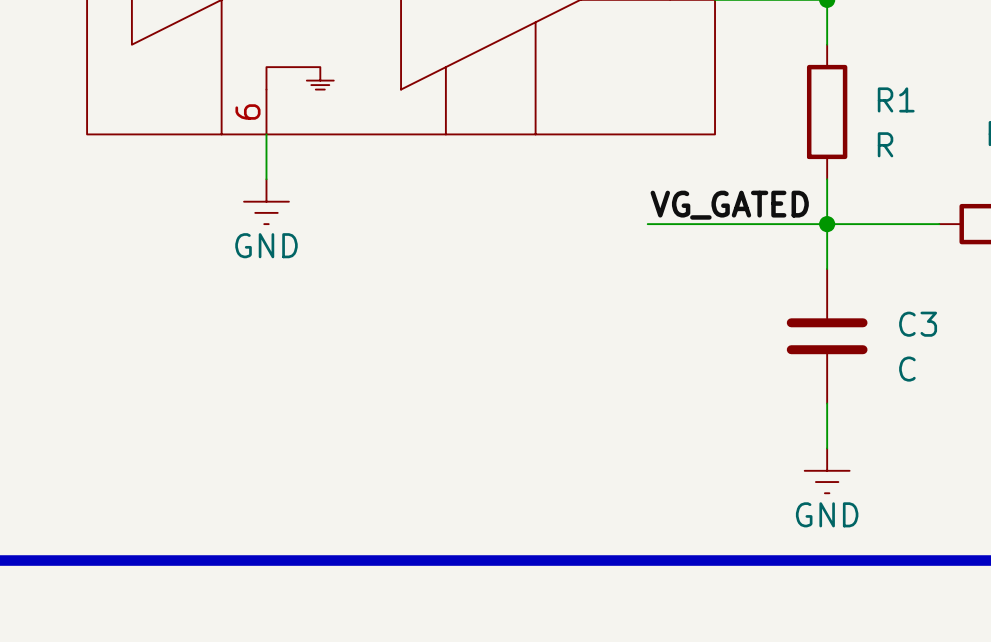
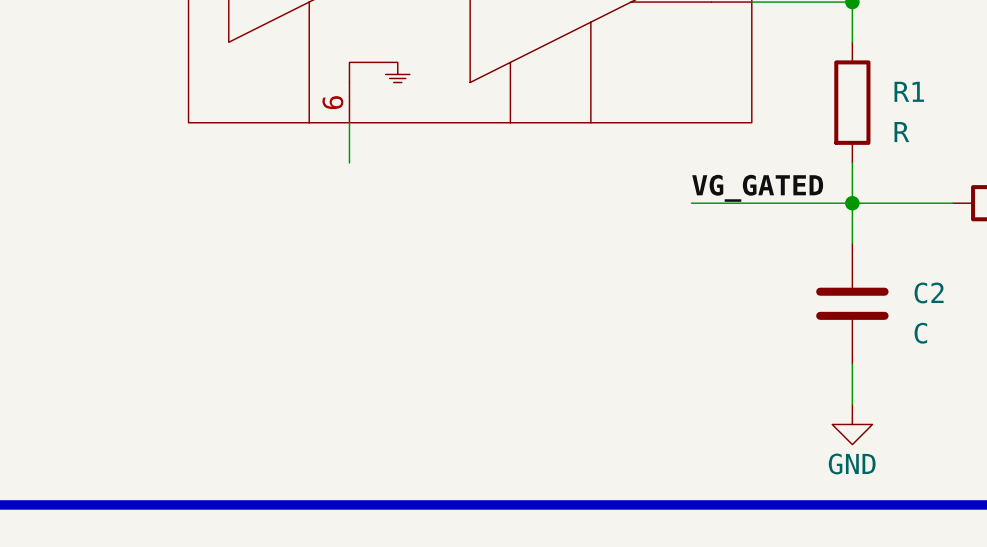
power symbol: GND (266, 201) -> none
C3 name: C3 (918, 324) -> C2 (929, 292)
power symbol shape: [804, 448, 850, 494] -> [832, 404, 873, 445]

